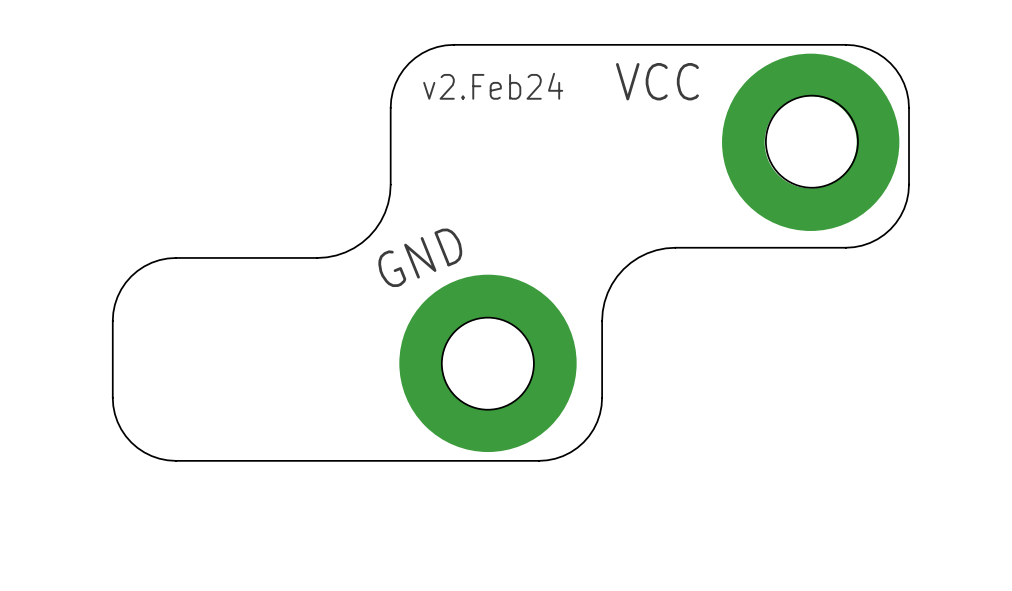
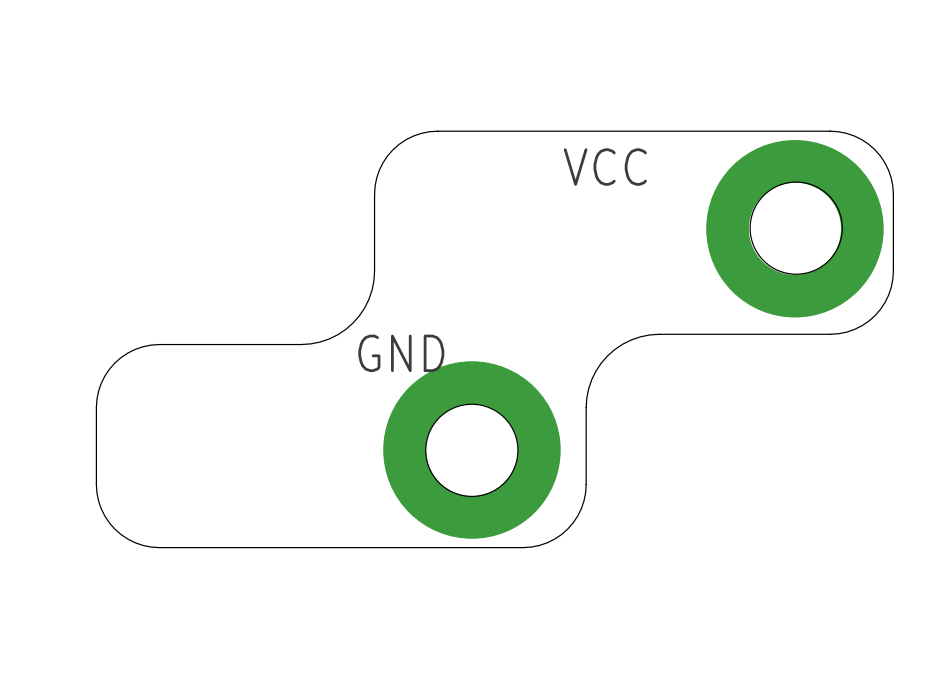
text position: VCC (657, 81) -> VCC (605, 167)
text: v2.Feb24 (493, 86) -> none
text rotation: 0° (420, 257) -> 22° clockwise (401, 353)

